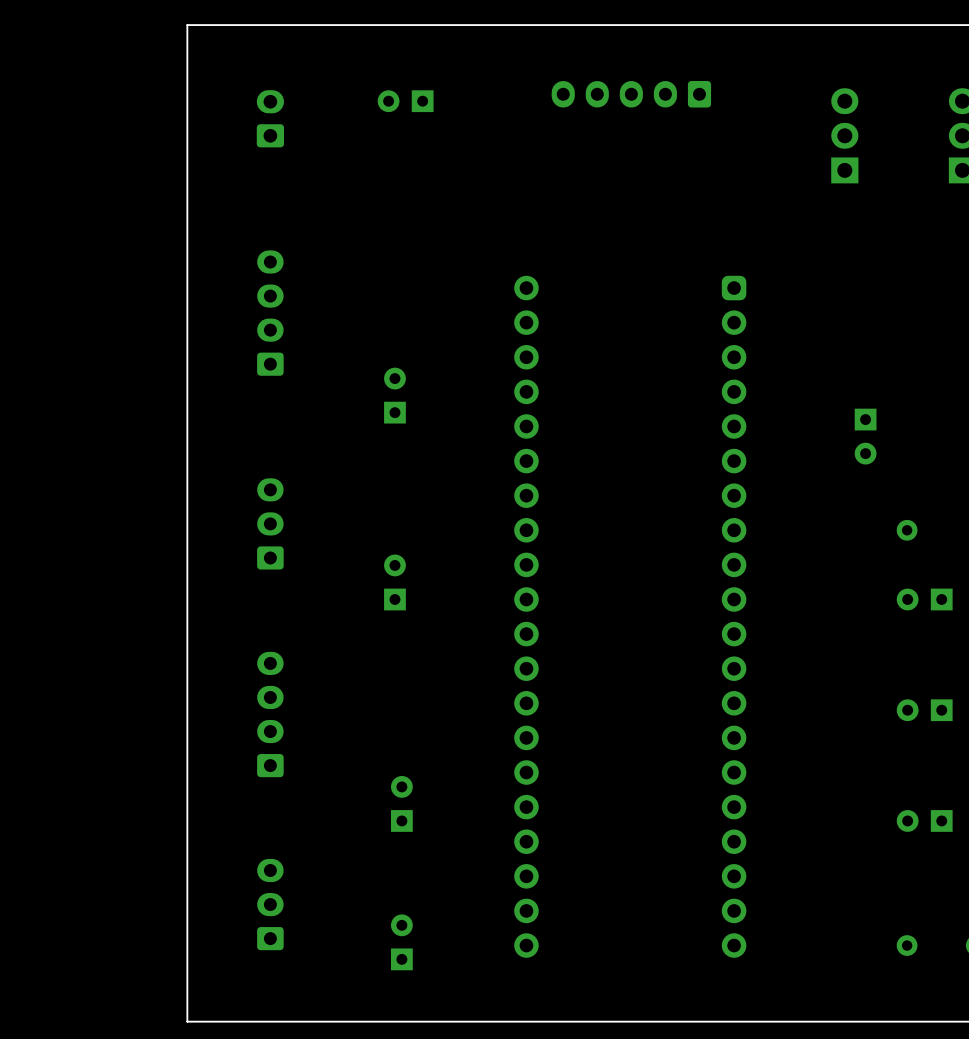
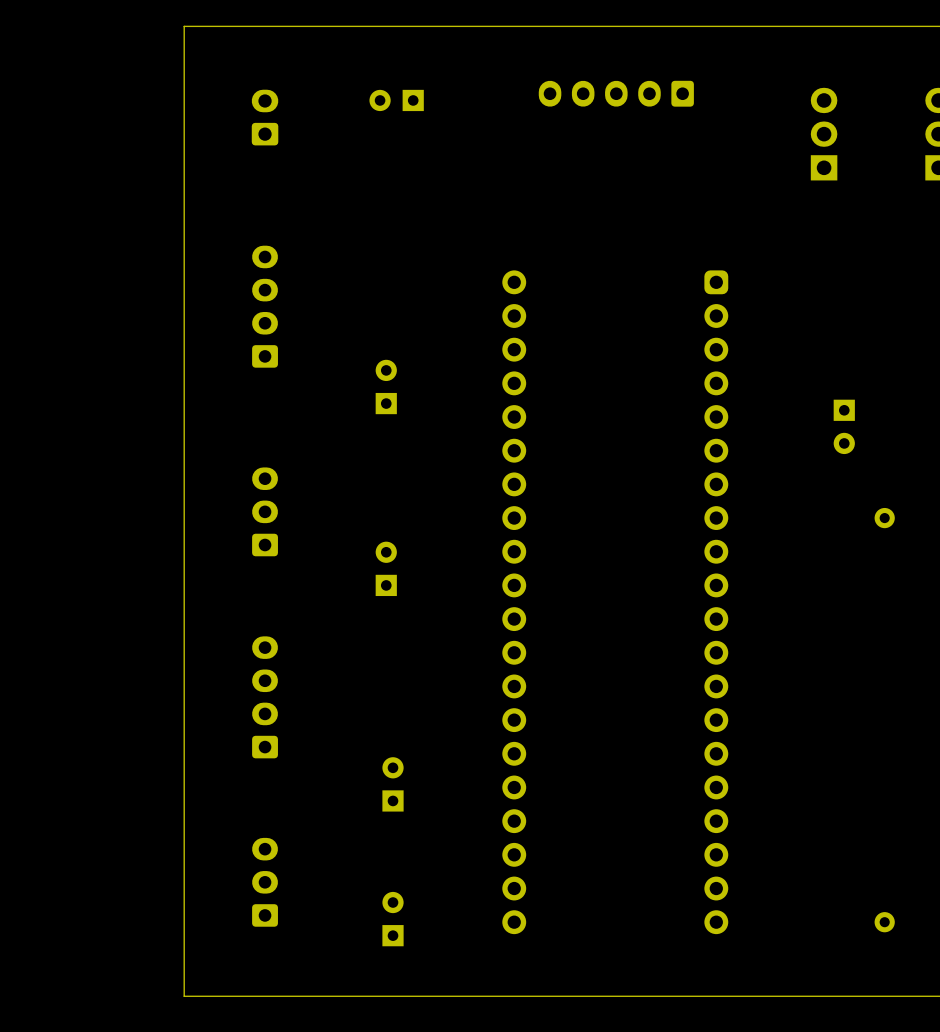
part: (924, 599) -> none
part: (924, 710) -> none
part: (924, 820) -> none

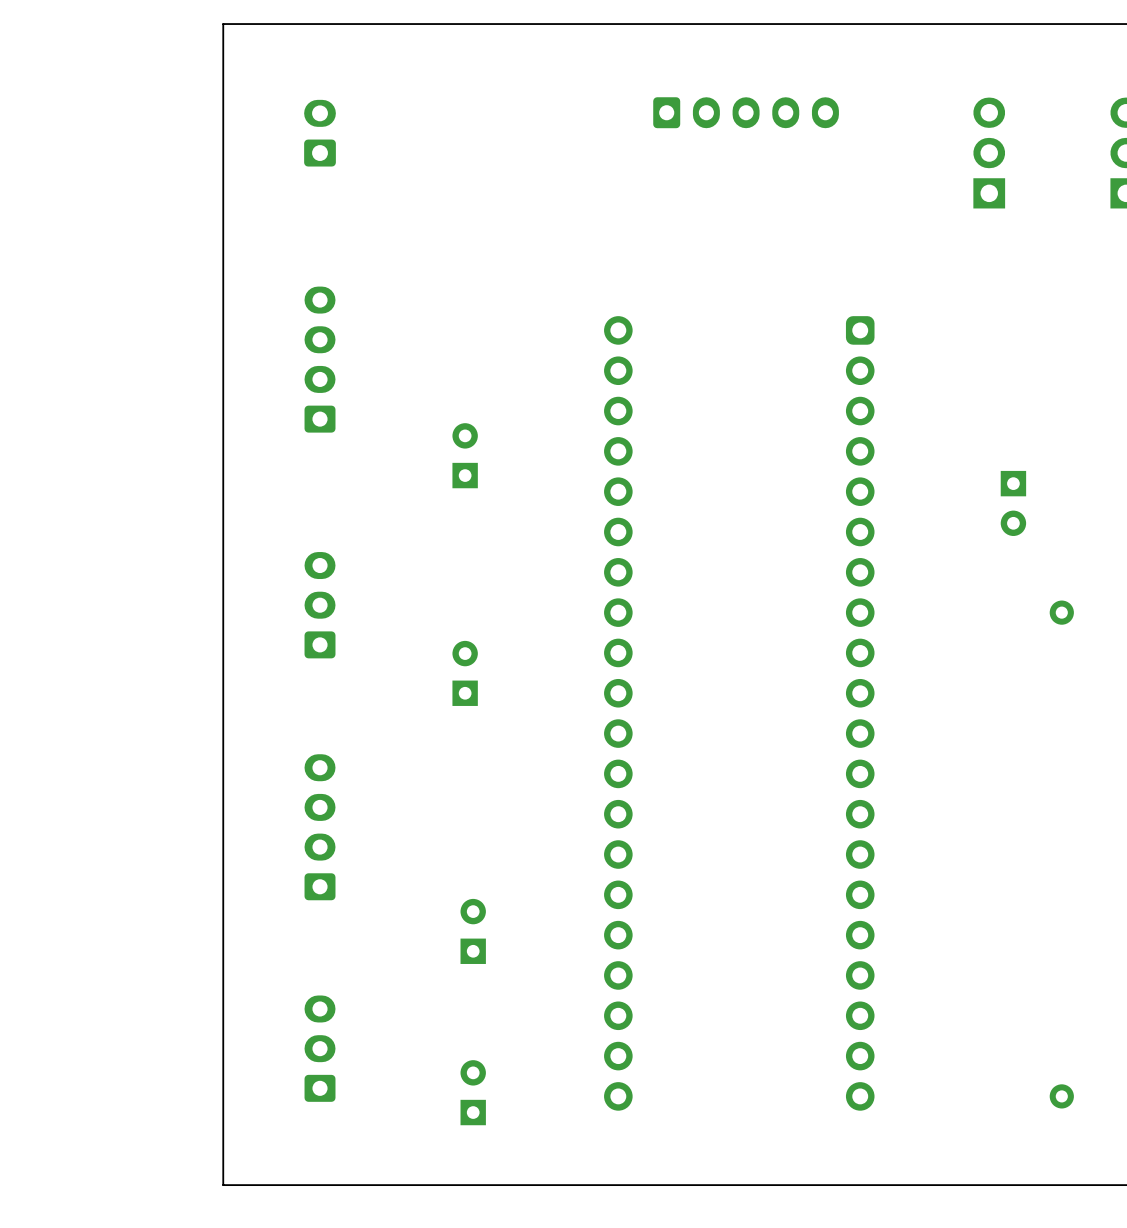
part rotation: 0° (616, 93) -> 180° (746, 112)
part: (396, 100) -> none

